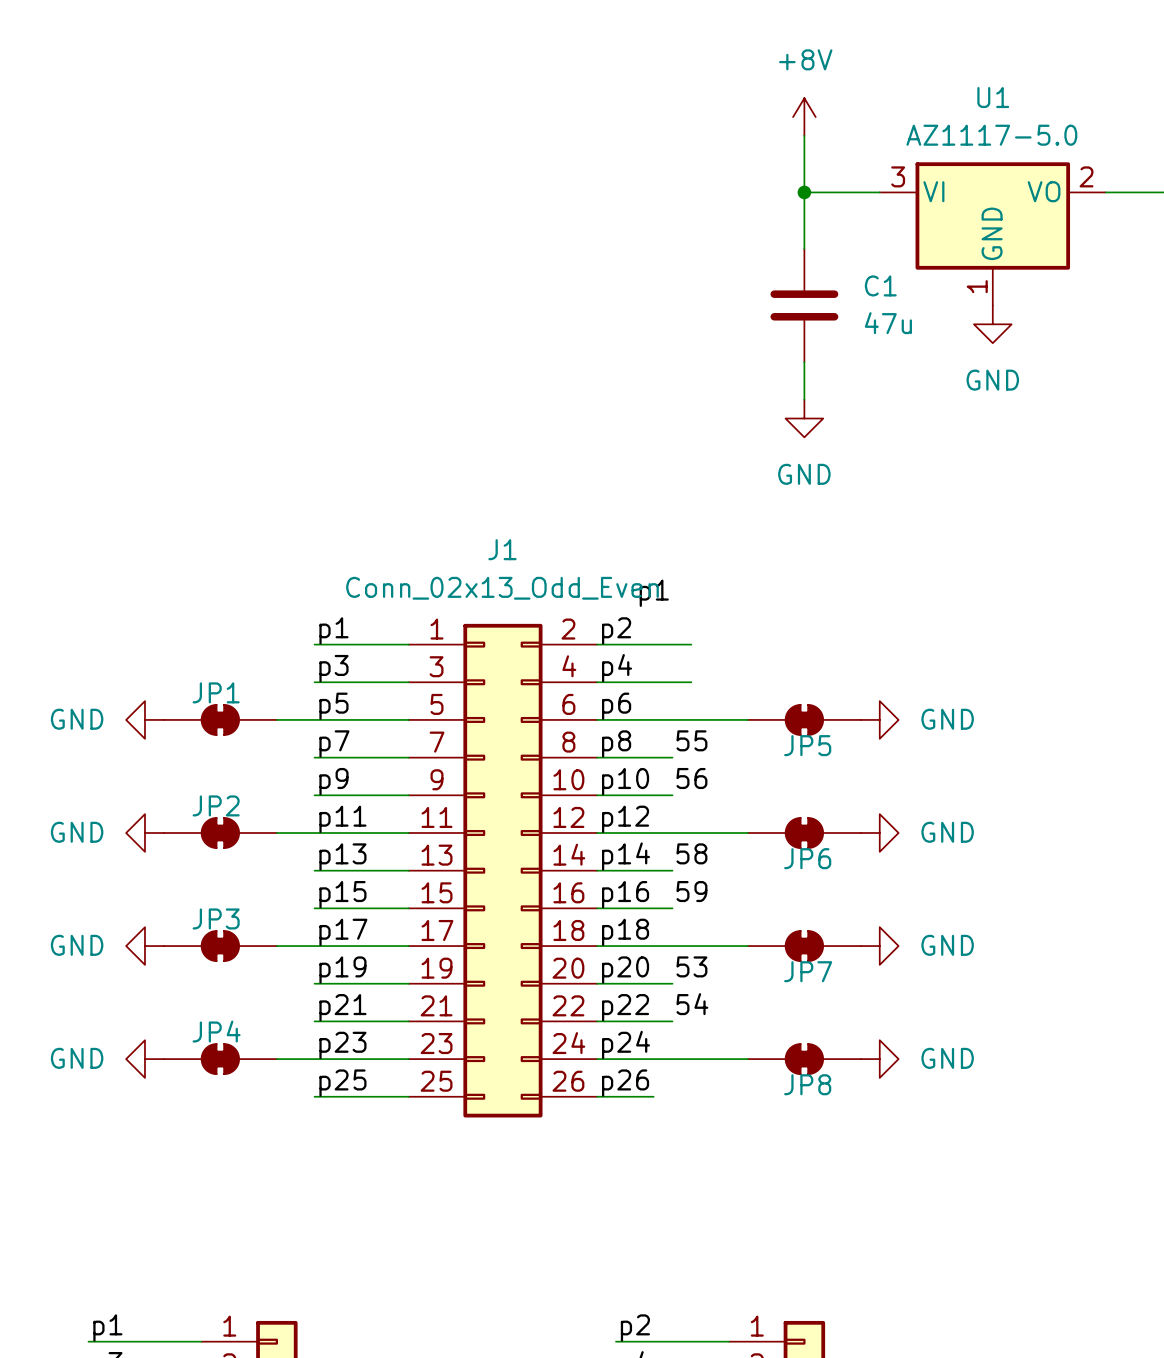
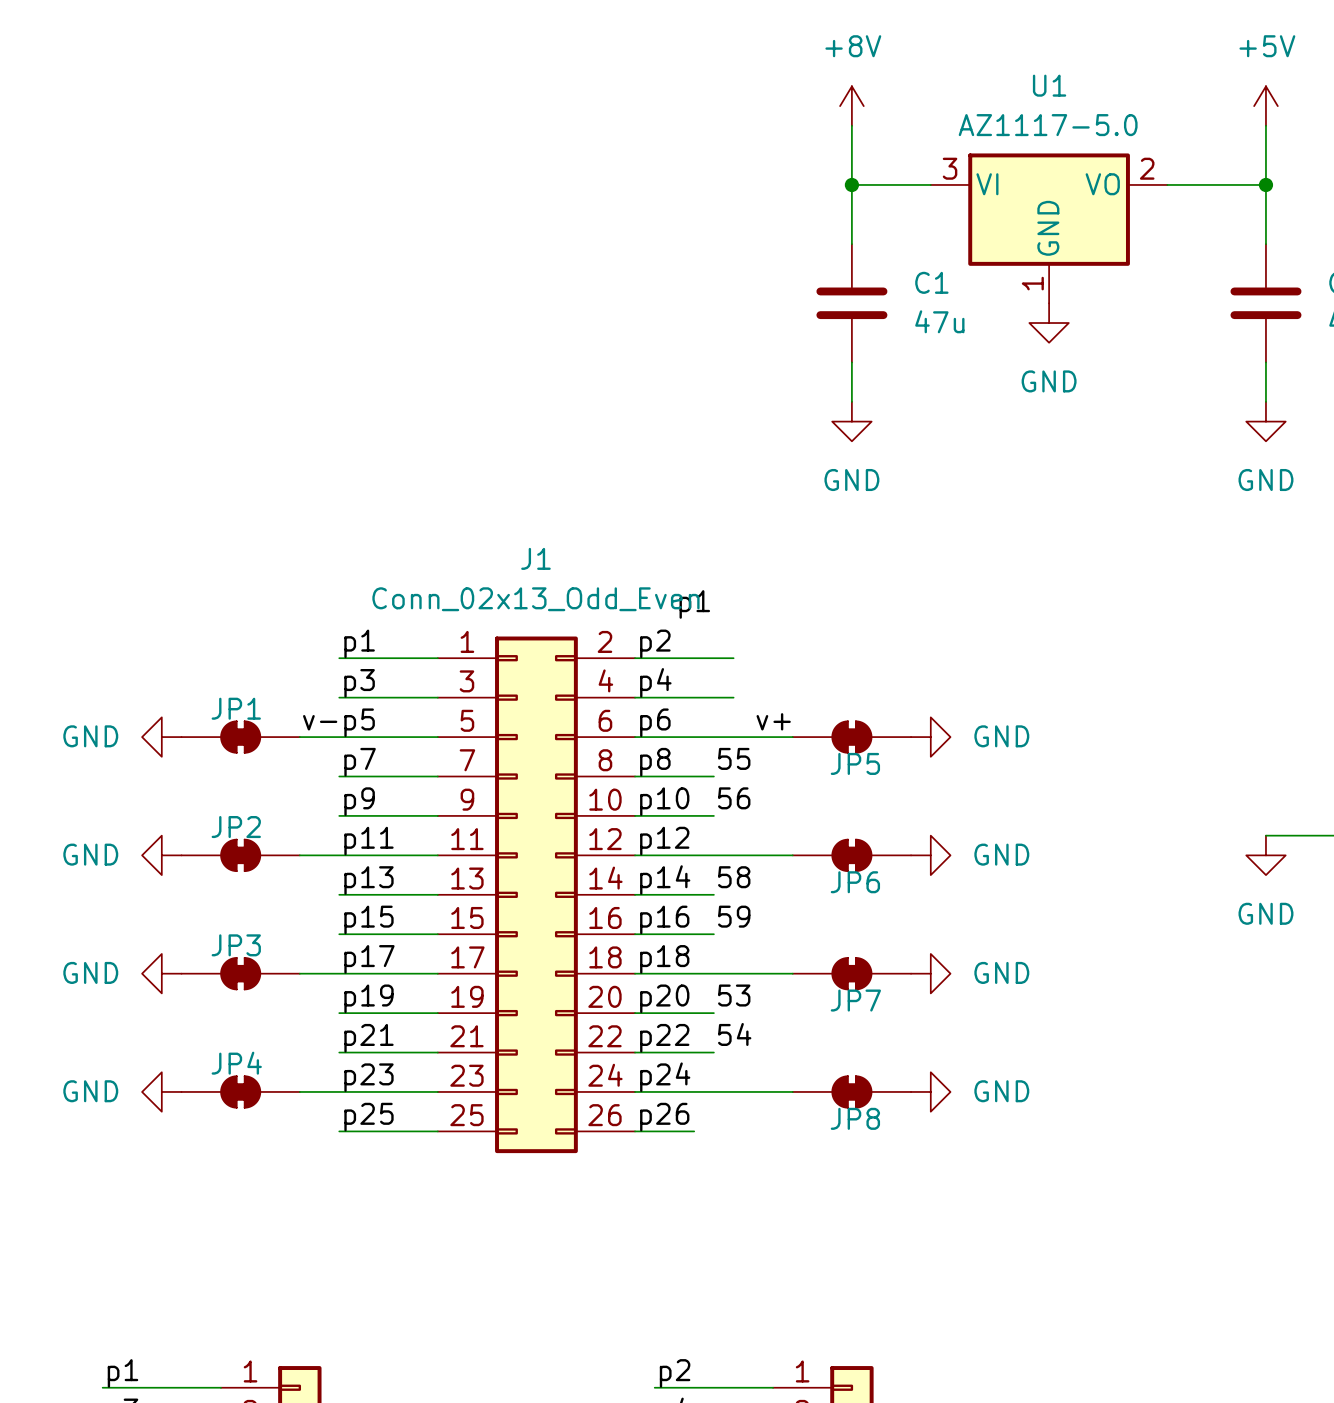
label: none -> v+ (773, 721)
label: none -> v- (320, 722)

